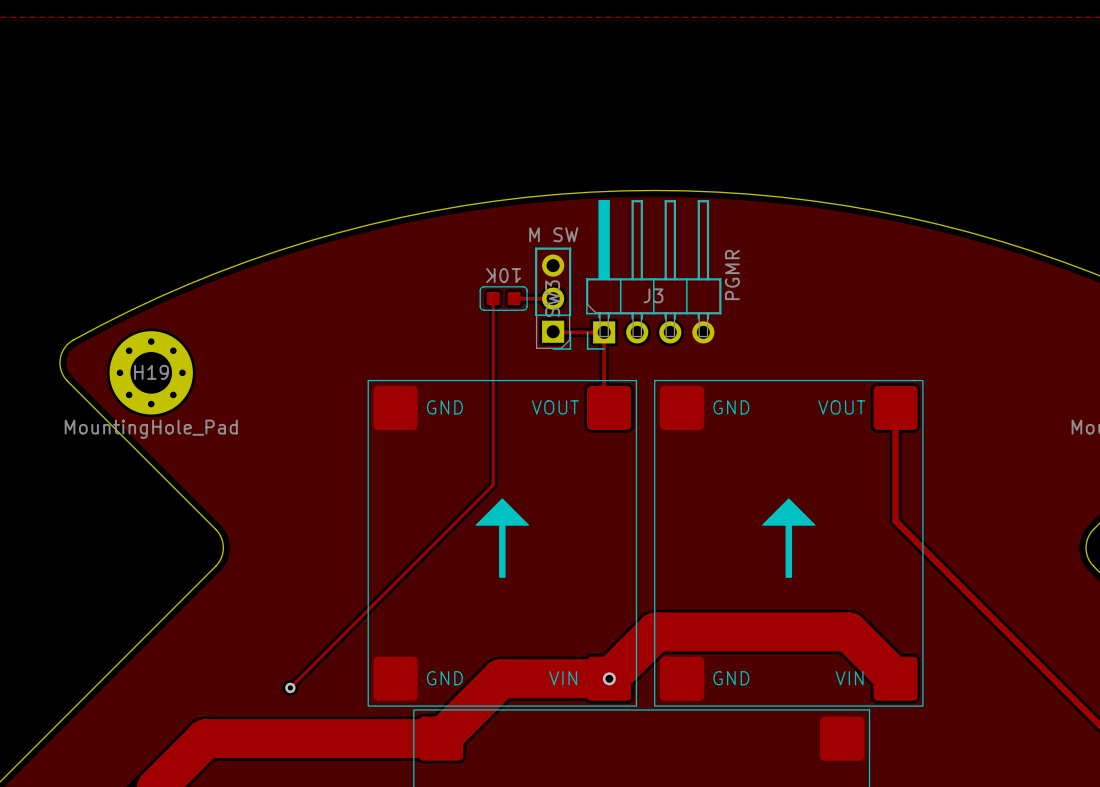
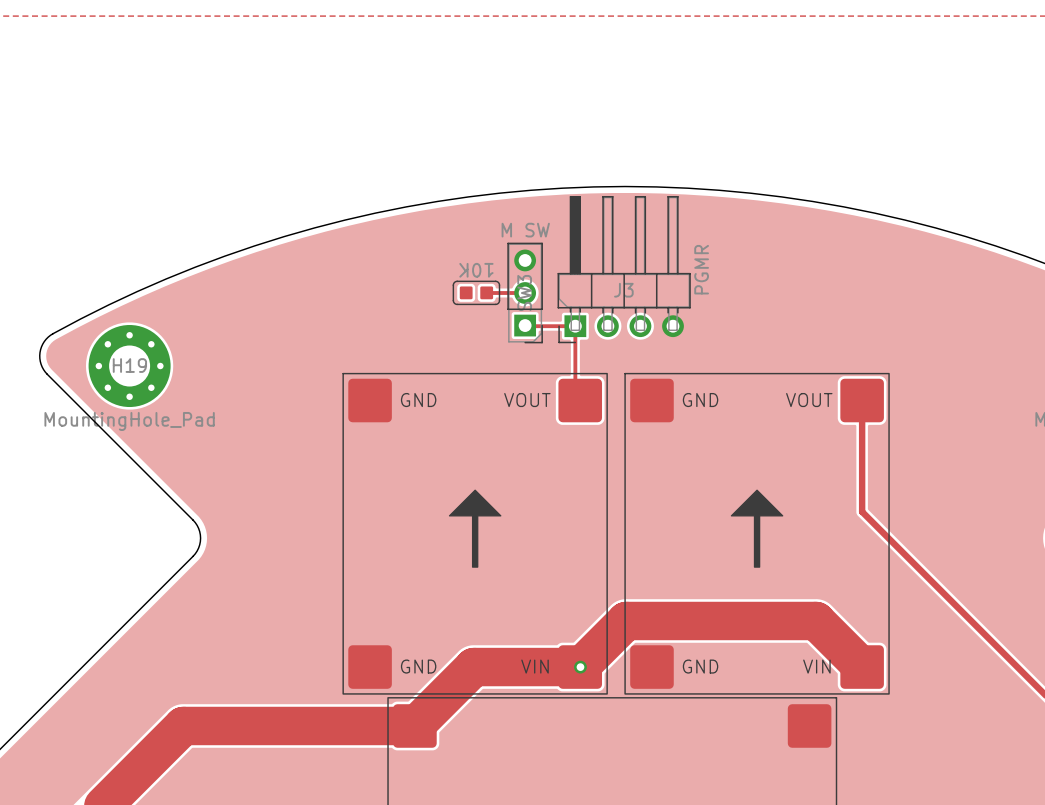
track: (493, 298) (493, 485) (290, 687) -> none
via: (290, 687) -> none

